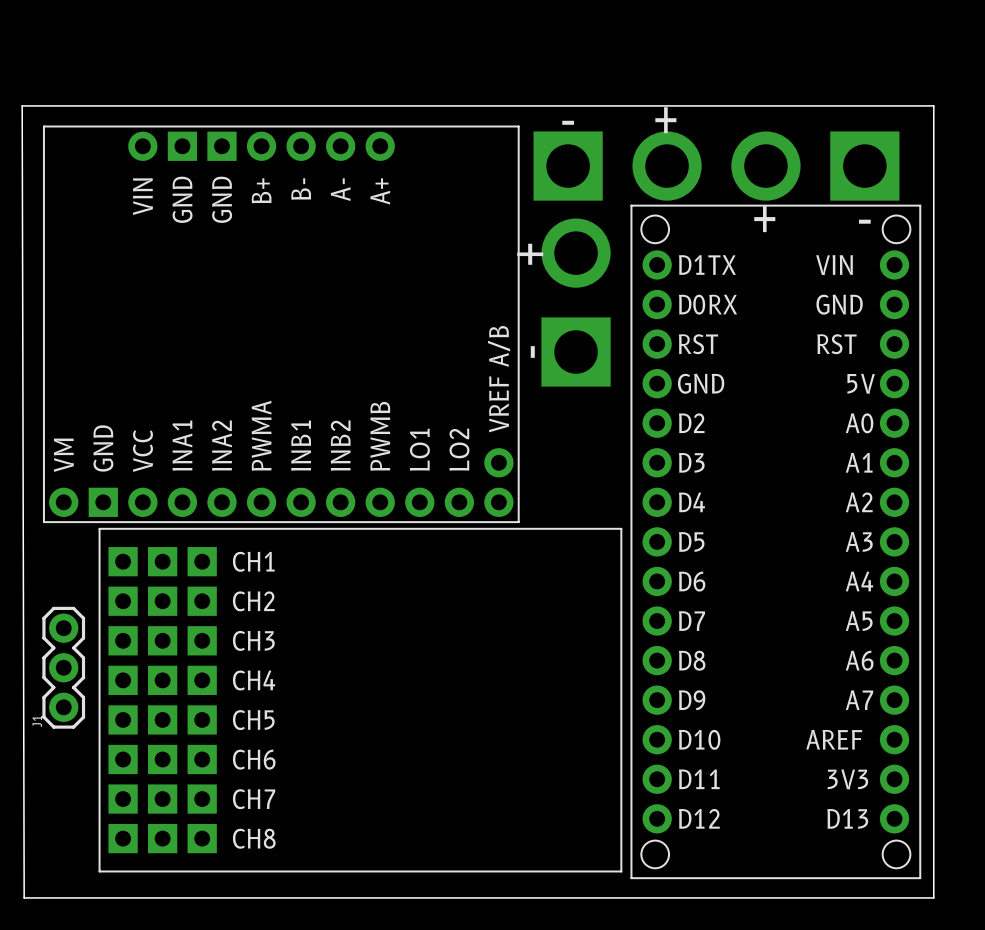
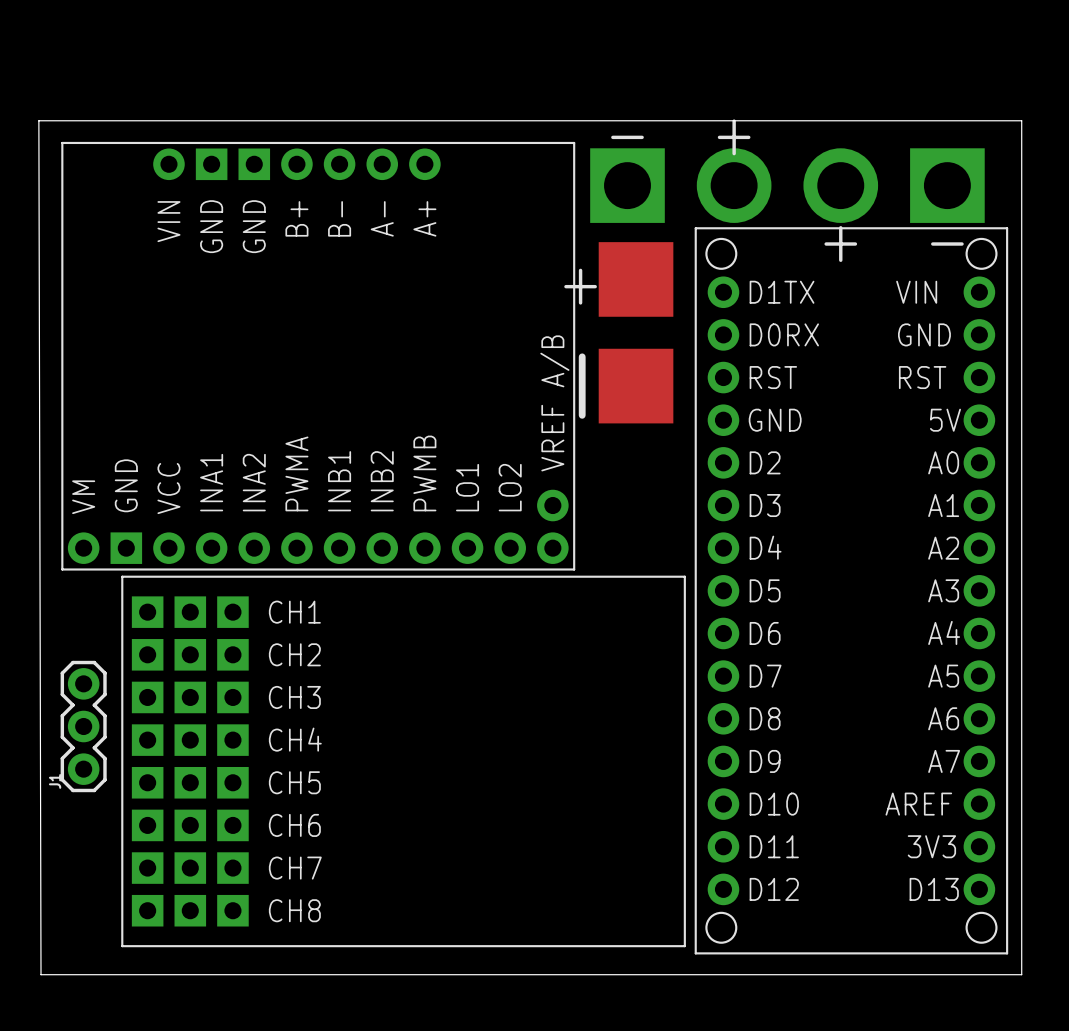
part footprint: [541, 218, 611, 387] -> [598, 242, 674, 424]

